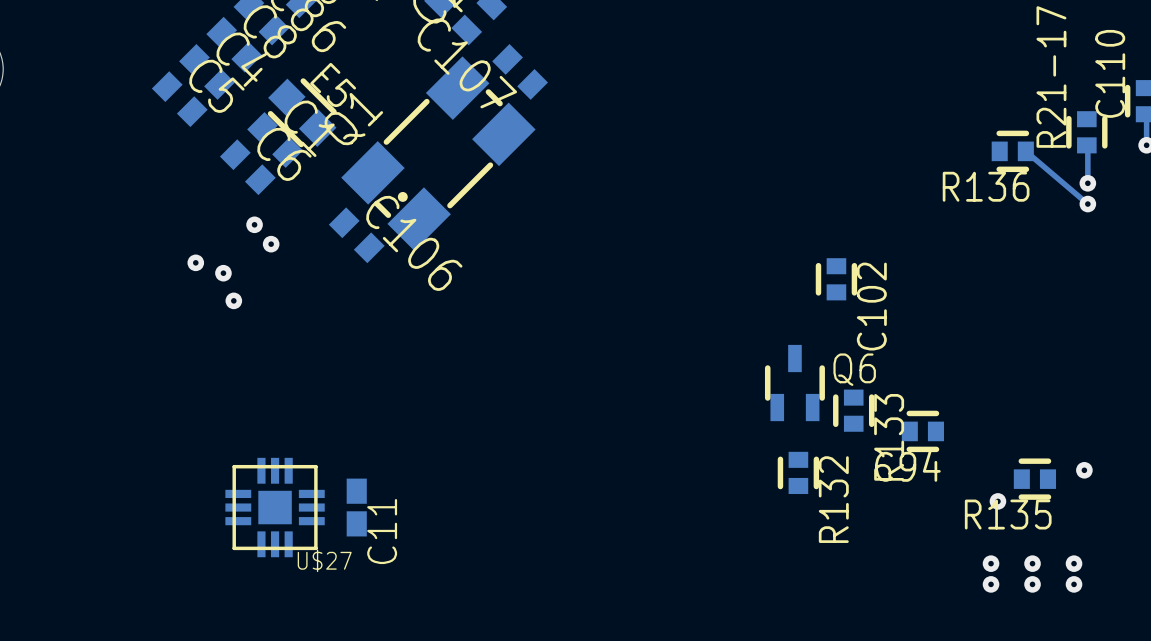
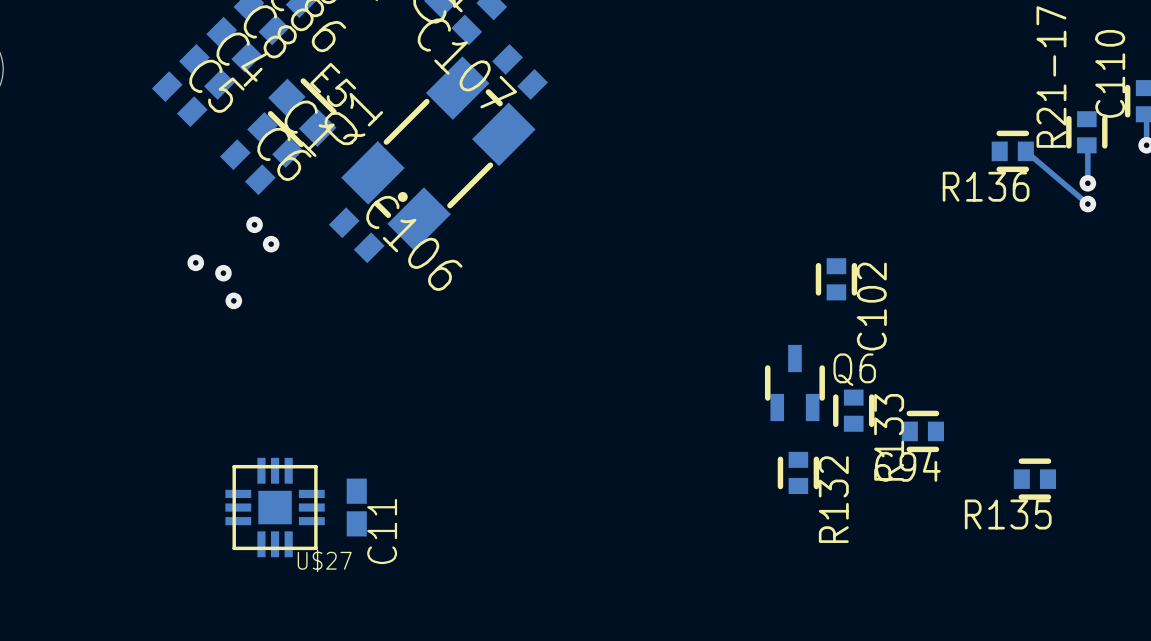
via: (1084, 470) -> none
via: (997, 501) -> none
via: (991, 563) -> none
via: (1032, 563) -> none
via: (1074, 563) -> none
via: (991, 584) -> none
via: (1032, 584) -> none
via: (1074, 584) -> none

